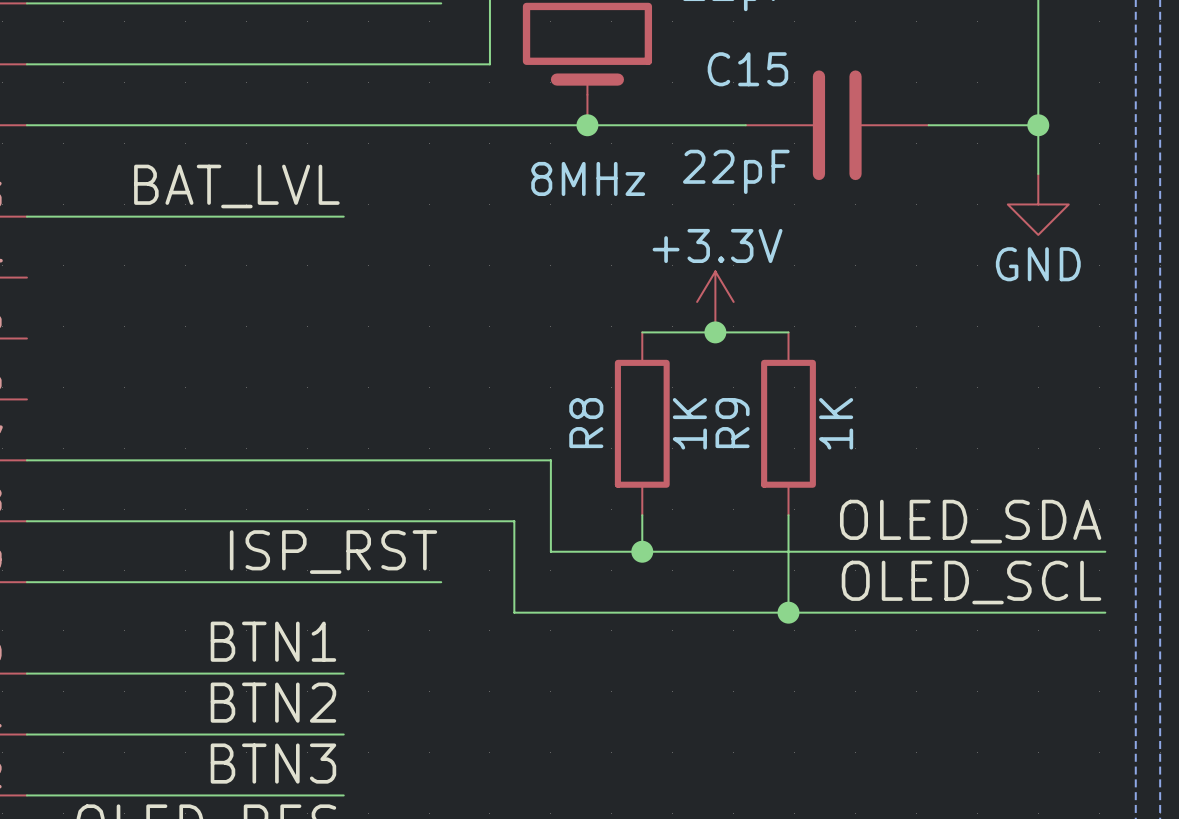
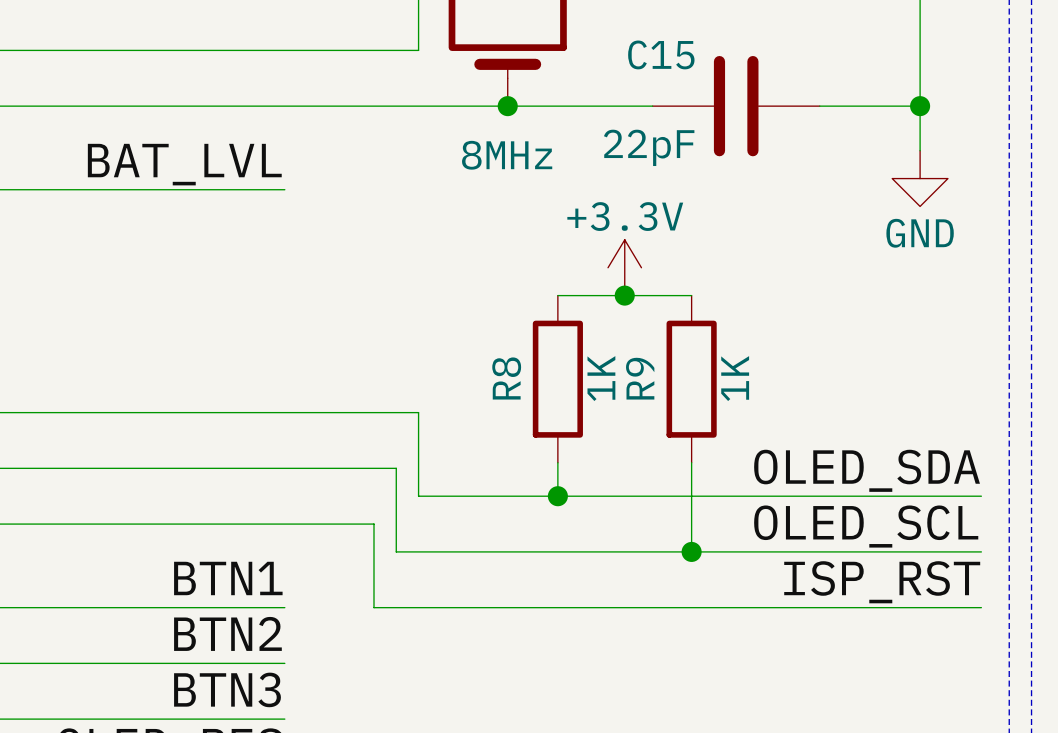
wire: (489, 460) (550, 460) (550, 551) -> (418, 412) (418, 496) (474, 496)
wire: (465, 521) (514, 521) (514, 612) -> (396, 468) (396, 551) (440, 551)
label: ISP_RST (333, 552) -> none
wire: none -> (373, 524) (373, 607) (981, 607)
label: none -> ISP_RST (882, 582)

